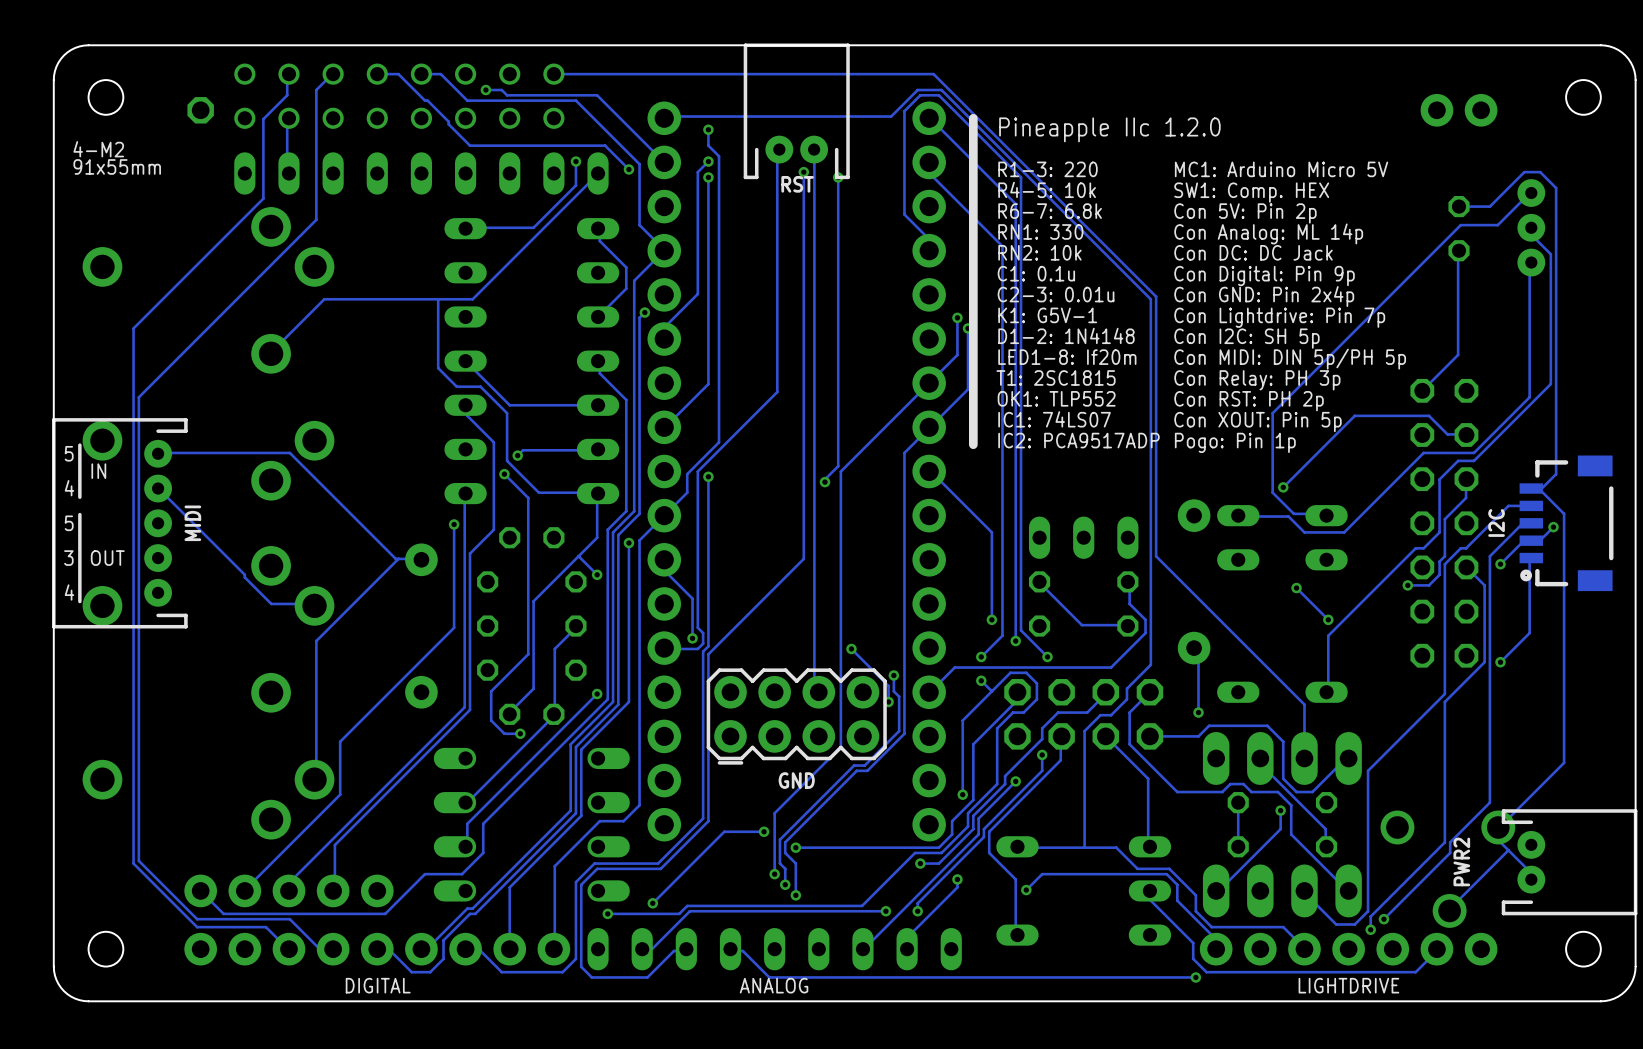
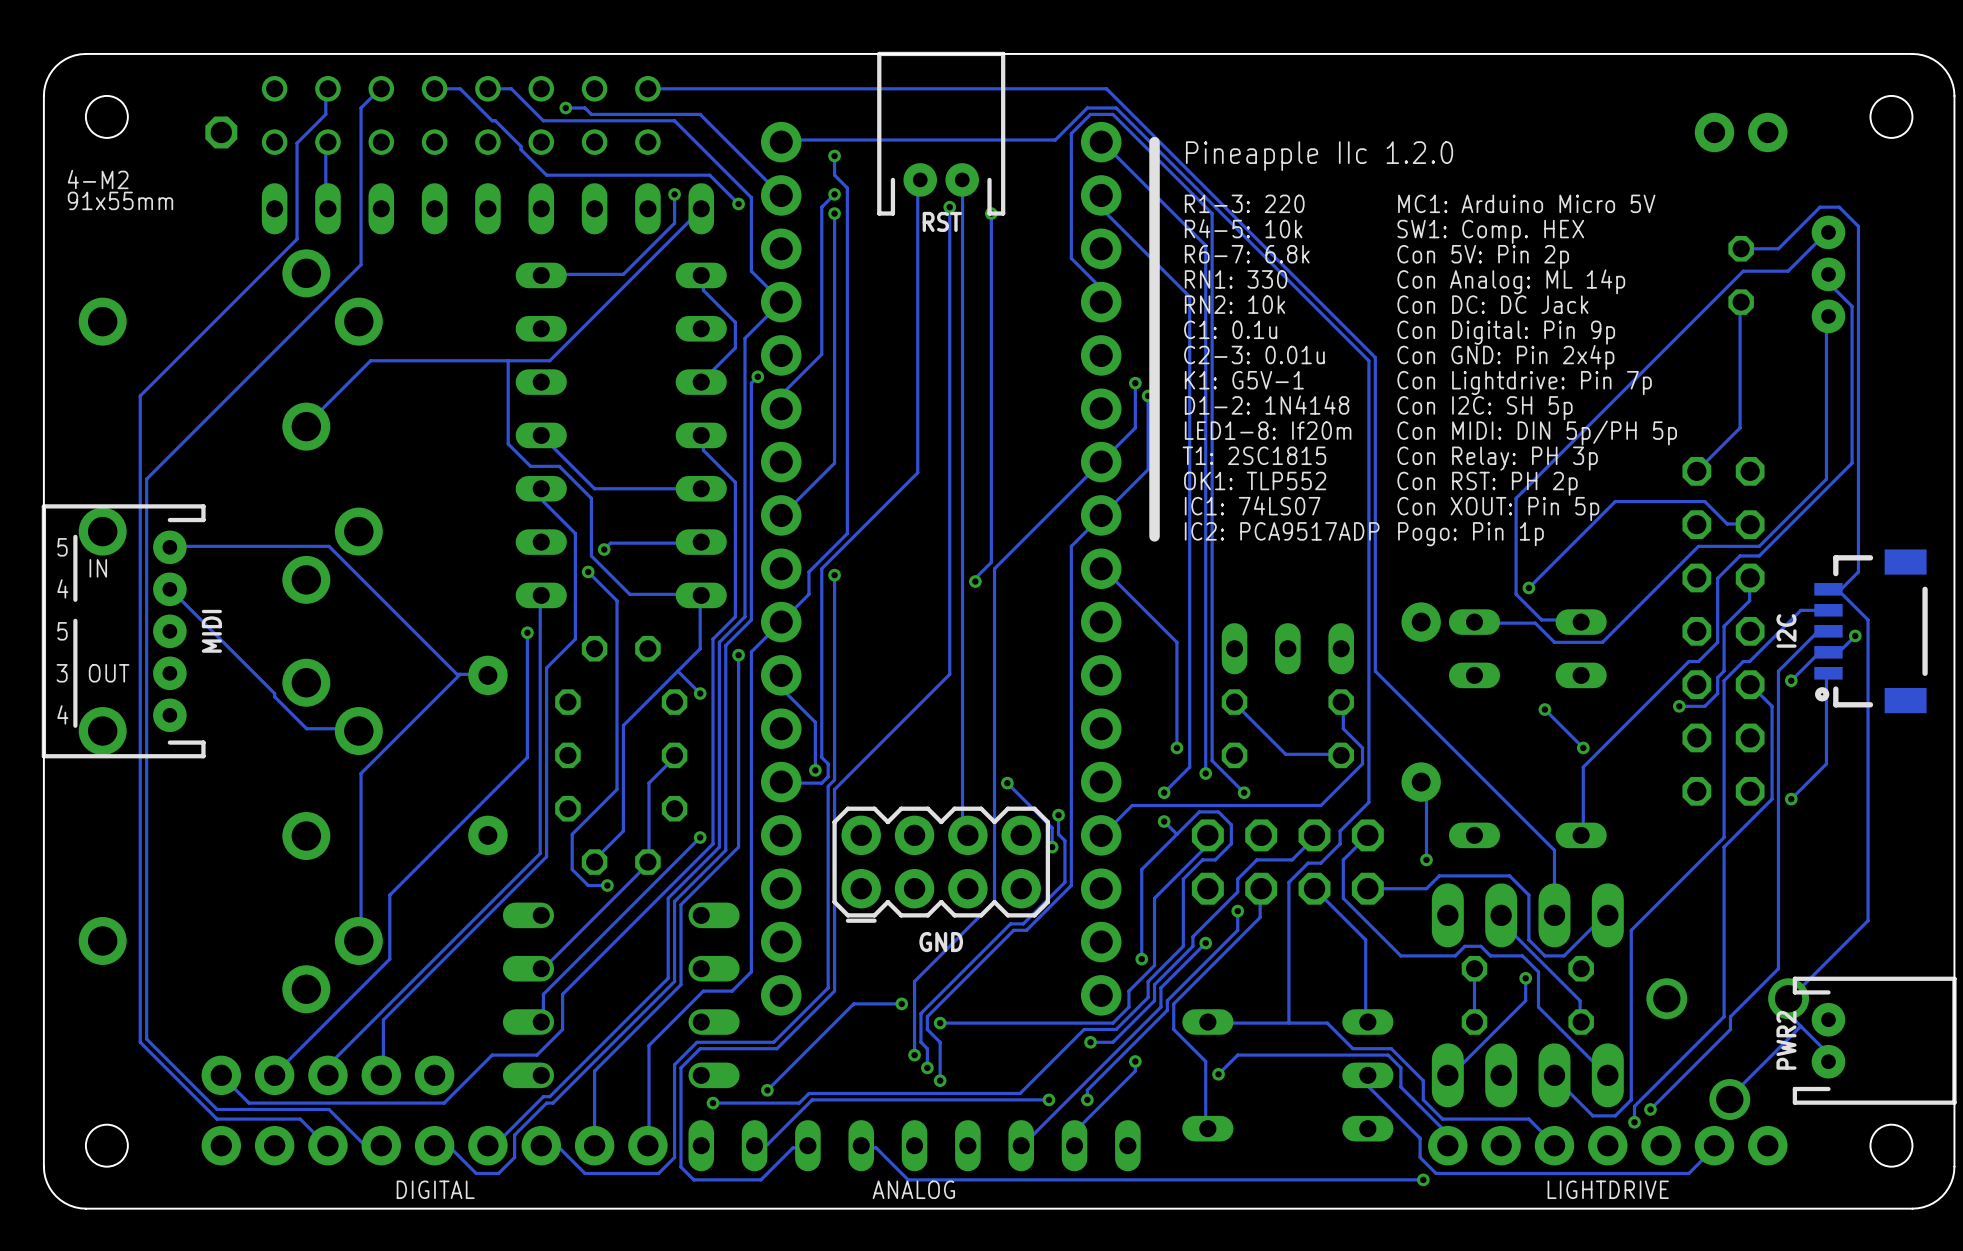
PWR2 name position: PWR2 (1461, 861) -> PWR2 (1786, 1040)

